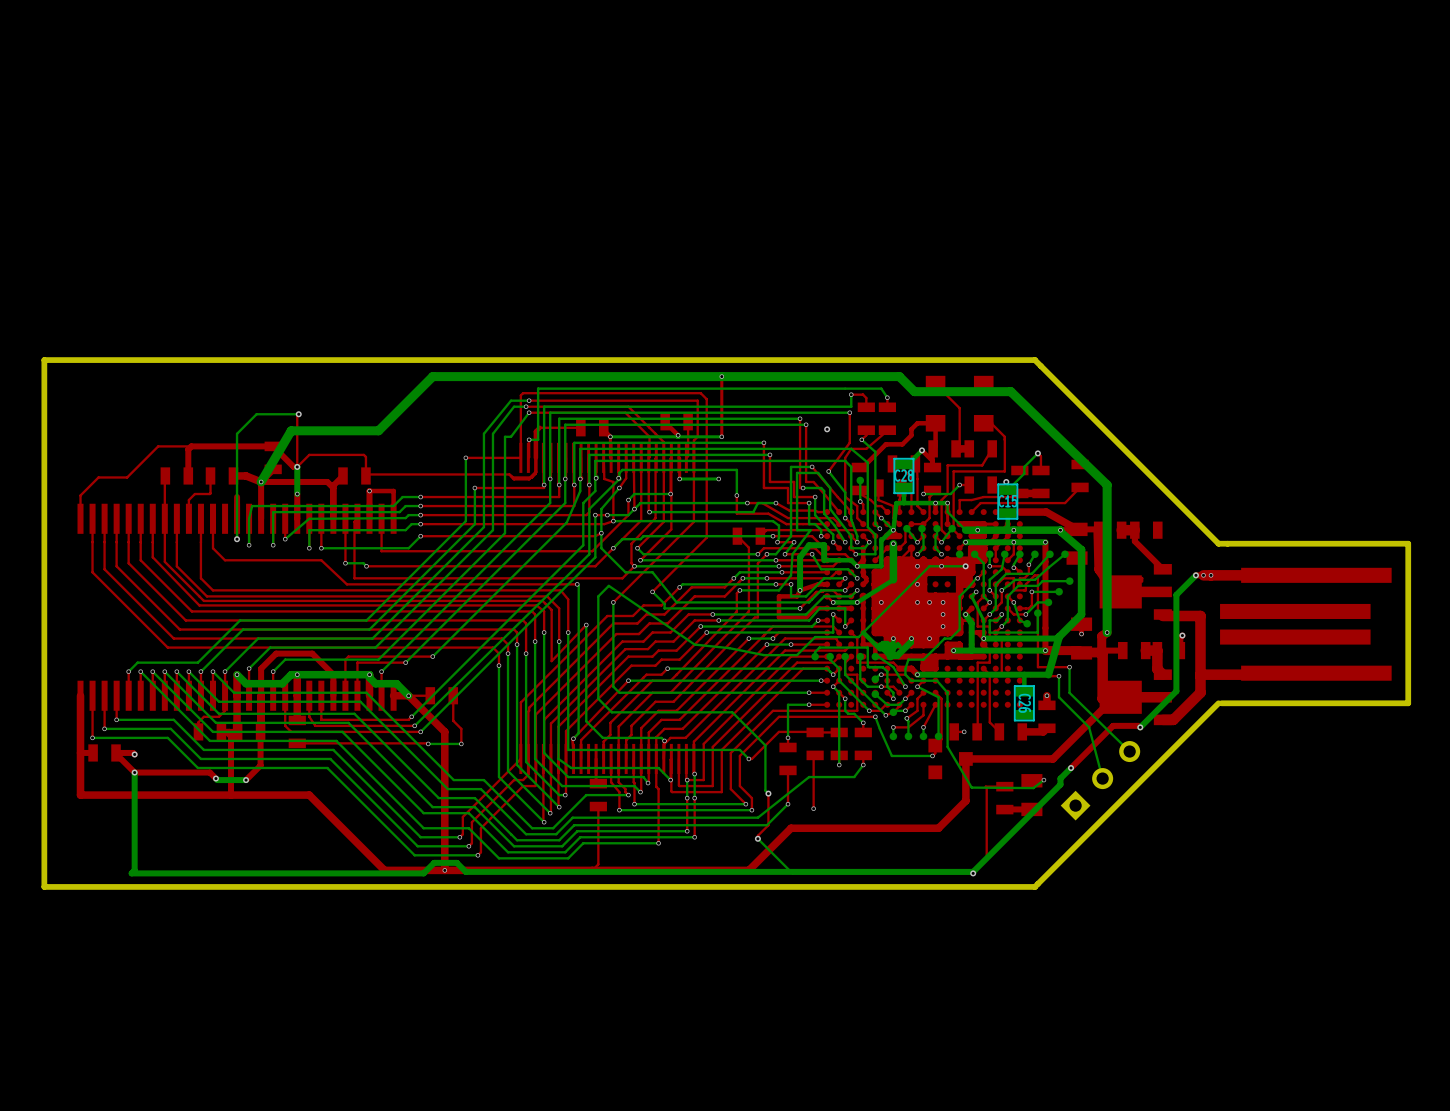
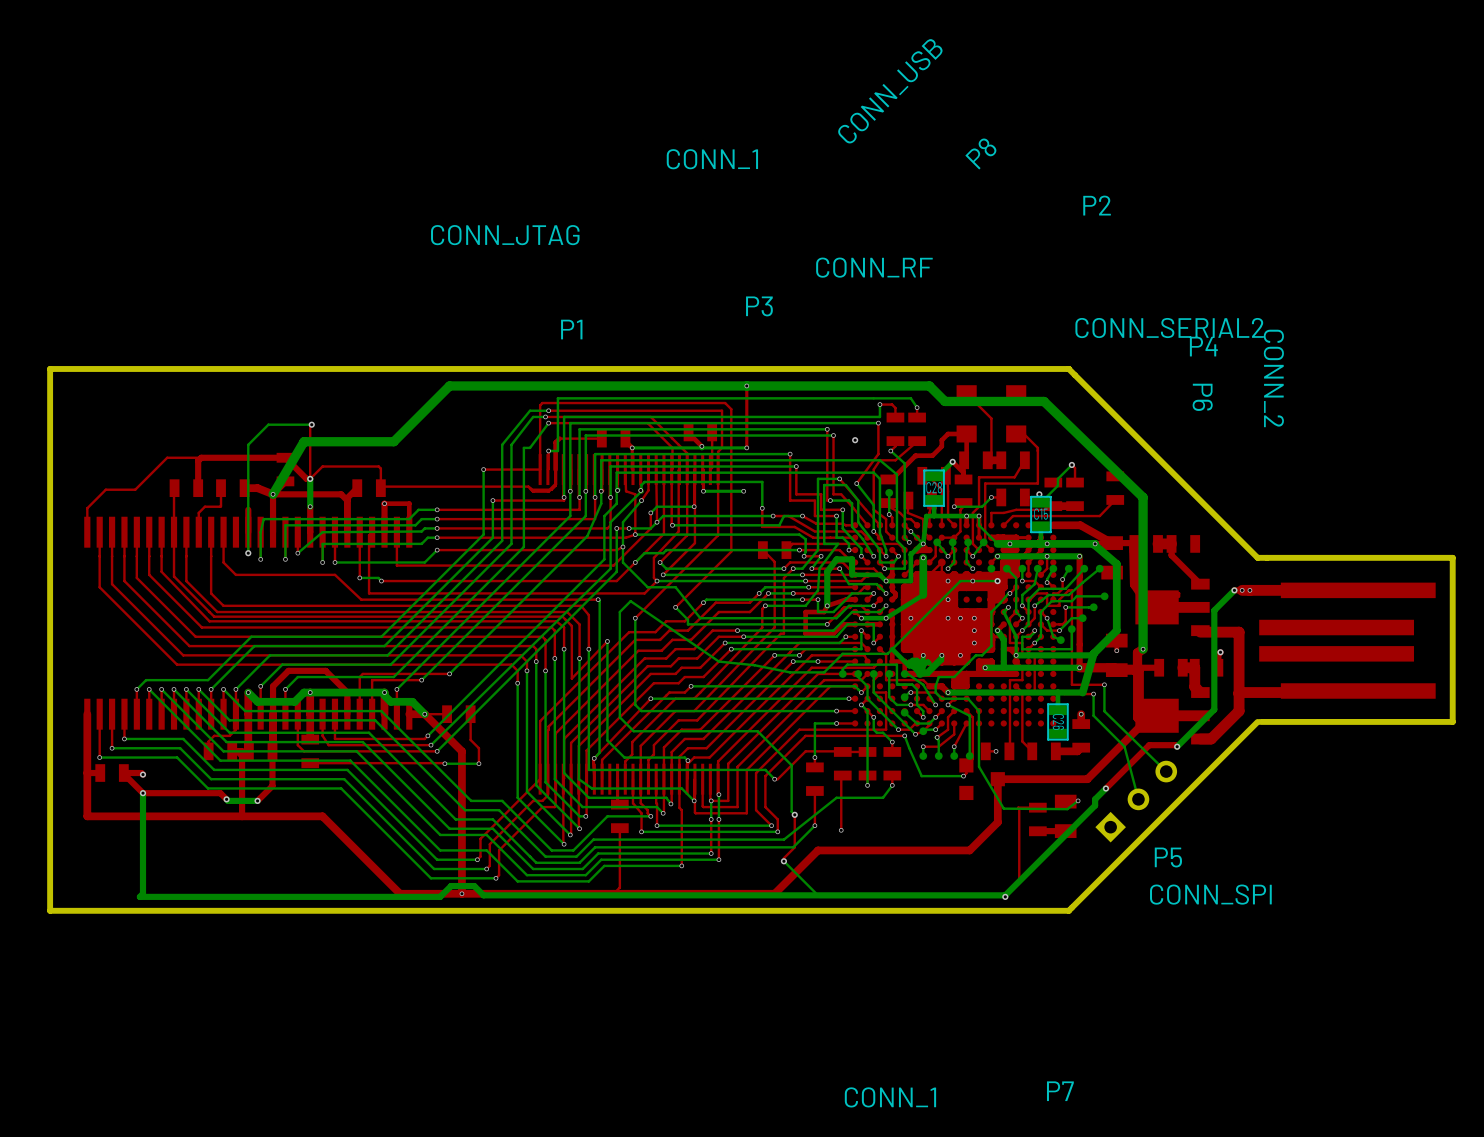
P8 value: none -> CONN_USB (890, 91)
P8 name: none -> P8 (980, 153)
P3 value: none -> CONN_1 (712, 159)
P2 name: none -> P2 (1097, 205)
P1 value: none -> CONN_JTAG (505, 235)
P2 value: none -> CONN_RF (874, 267)
P3 name: none -> P3 (759, 306)
P1 name: none -> P1 (571, 329)
P4 value: none -> CONN_SERIAL2 (1169, 328)
P4 name: none -> P4 (1203, 346)
P6 value: none -> CONN_2 (1273, 378)
P6 name: none -> P6 (1202, 397)
P5 name: none -> P5 (1168, 857)
P5 value: none -> CONN_SPI (1210, 894)
P7 name: none -> P7 (1060, 1091)
P7 value: none -> CONN_1 (890, 1097)

